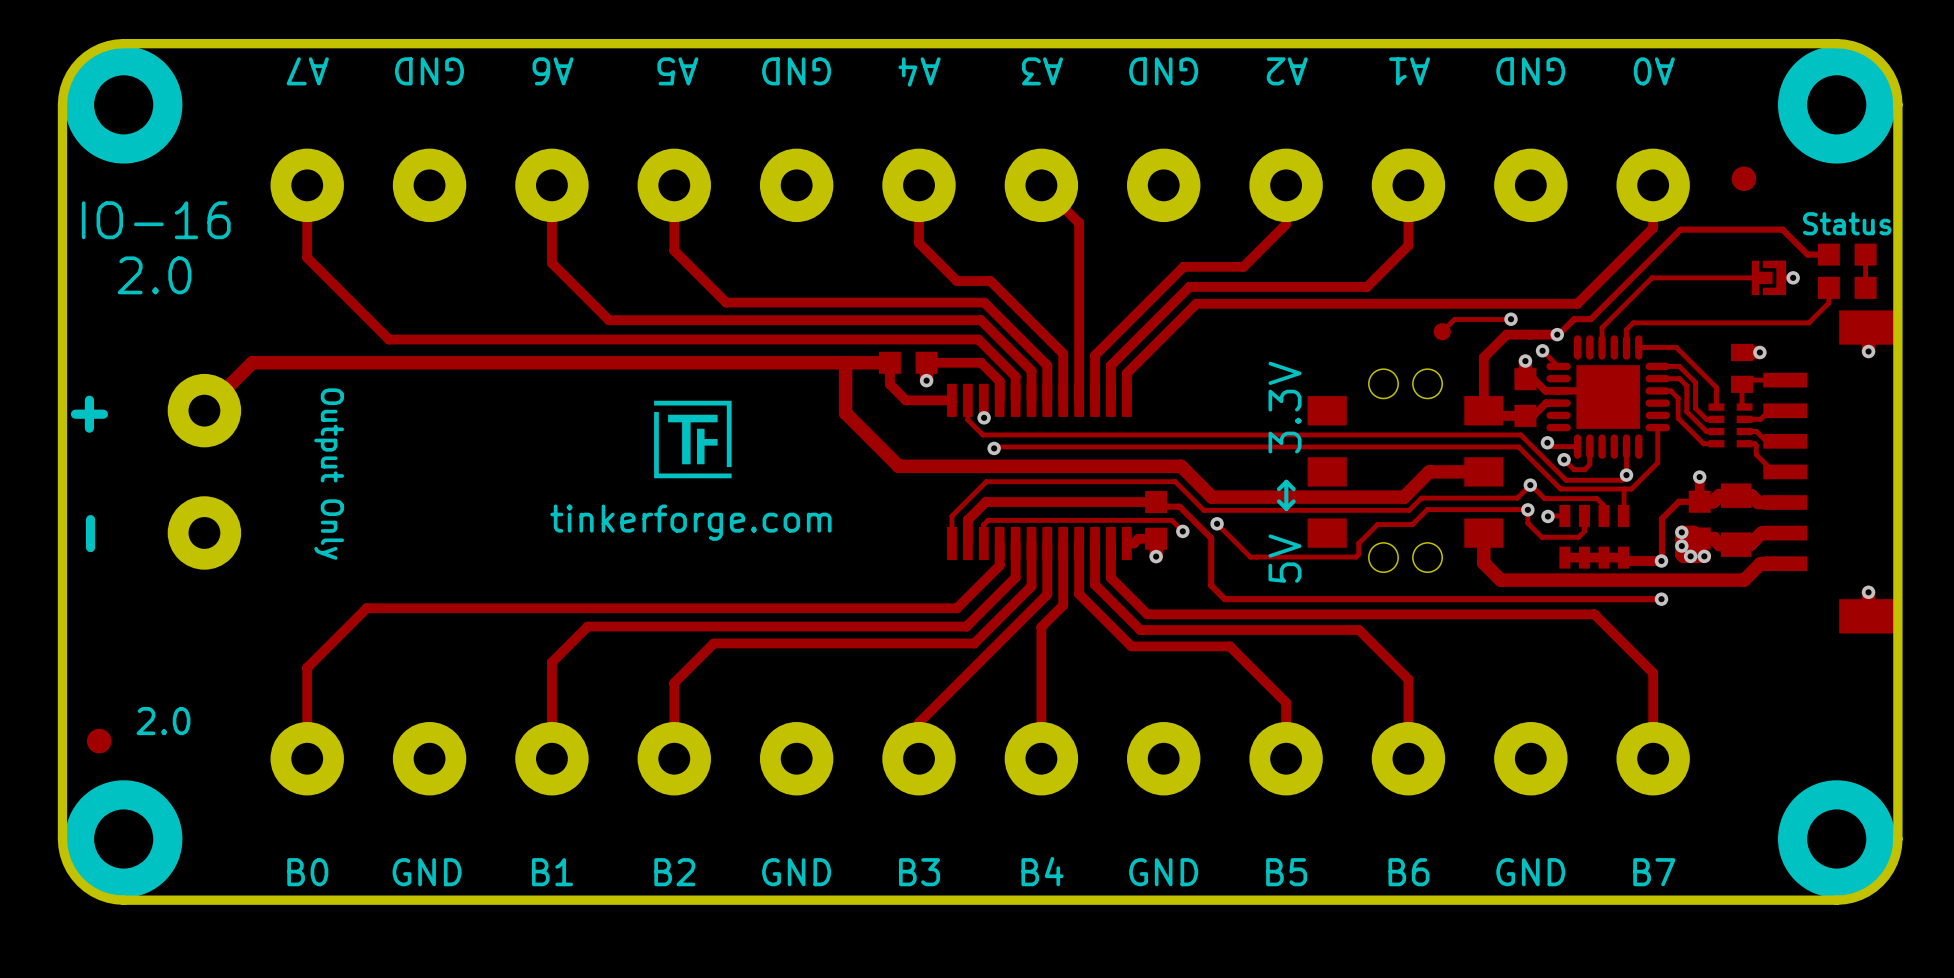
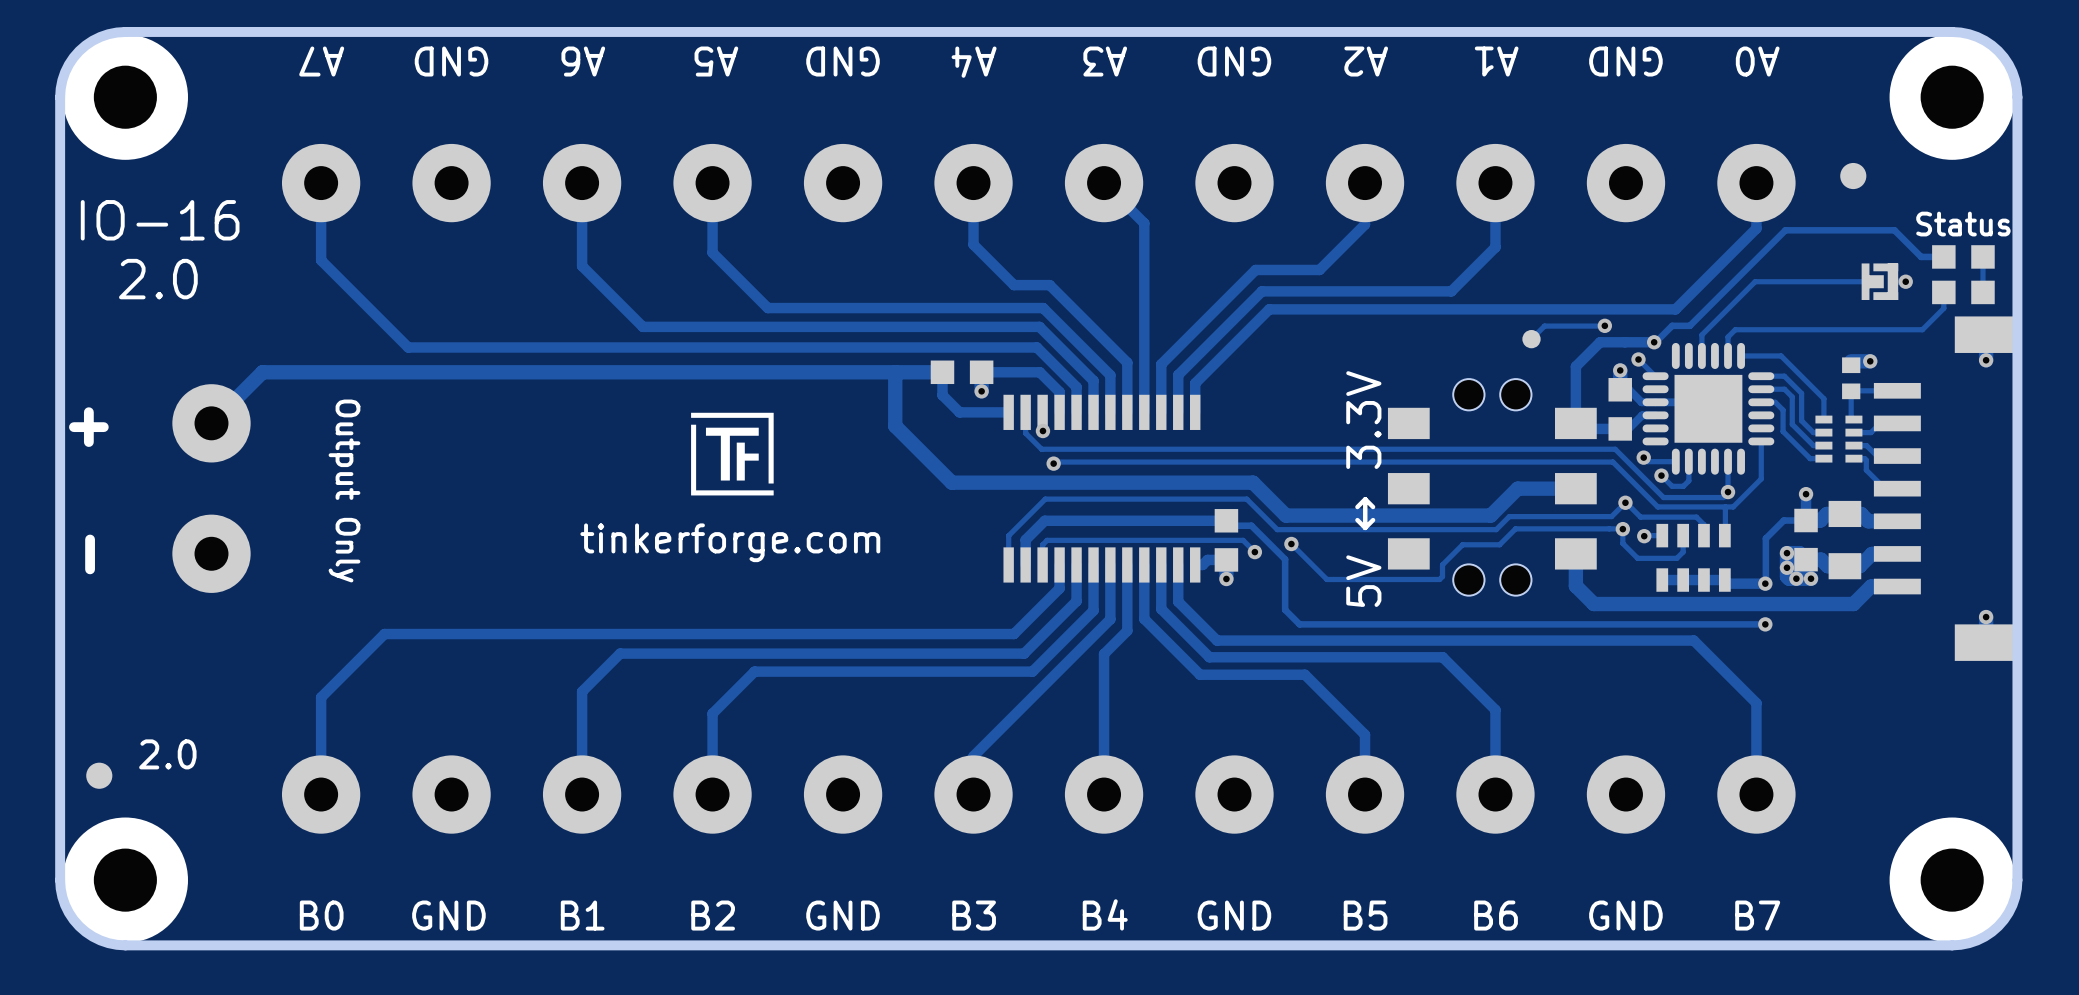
part footprint: [1731, 343, 1754, 393] -> [1842, 357, 1861, 400]

